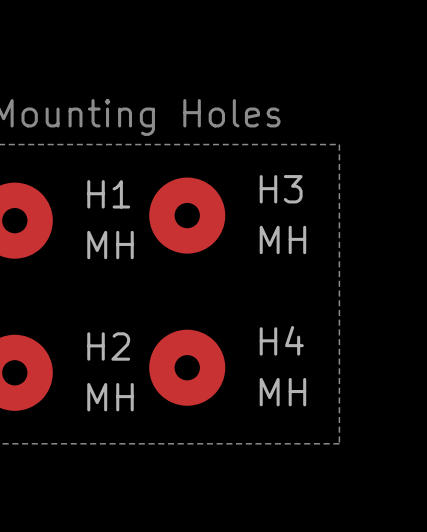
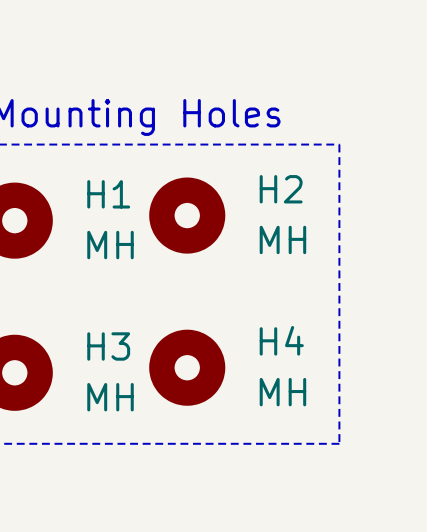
H3 name: H3 (281, 189) -> H2 (281, 189)
H2 name: H2 (108, 346) -> H3 (108, 346)

